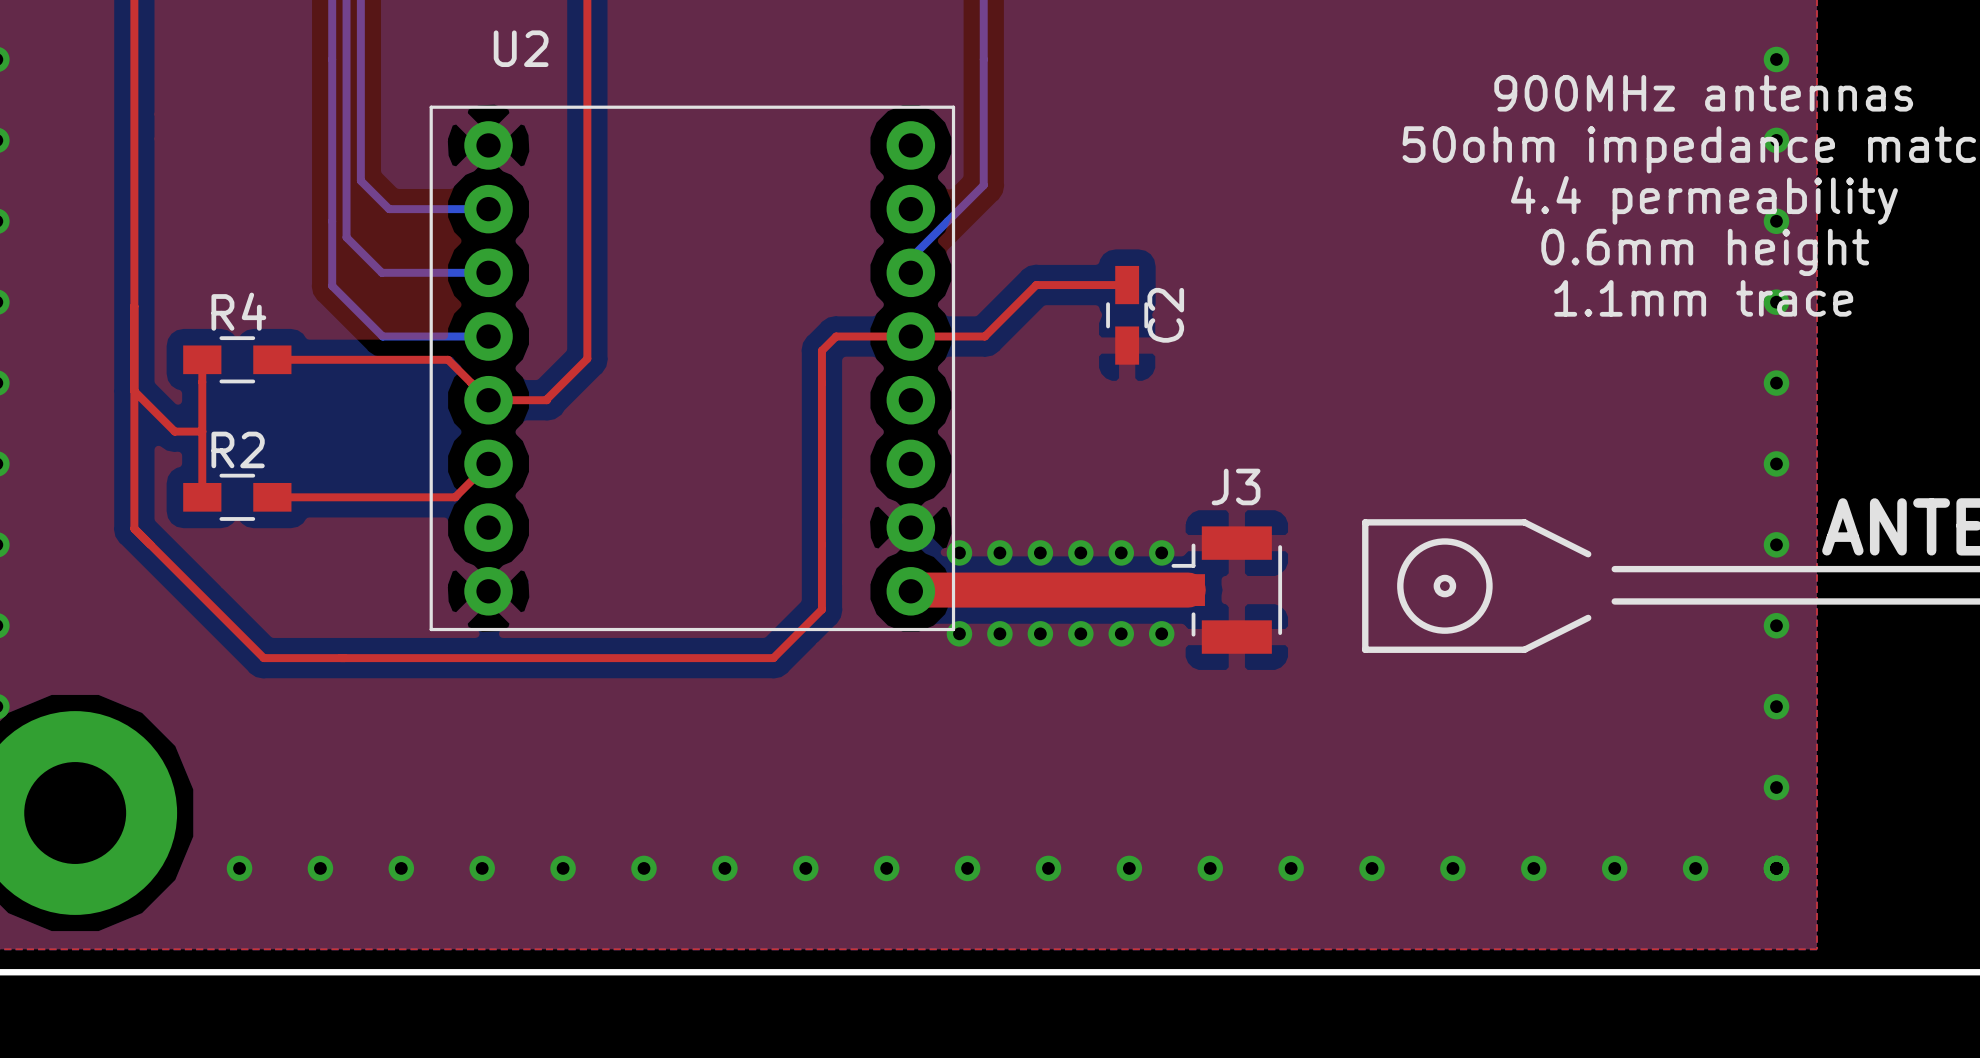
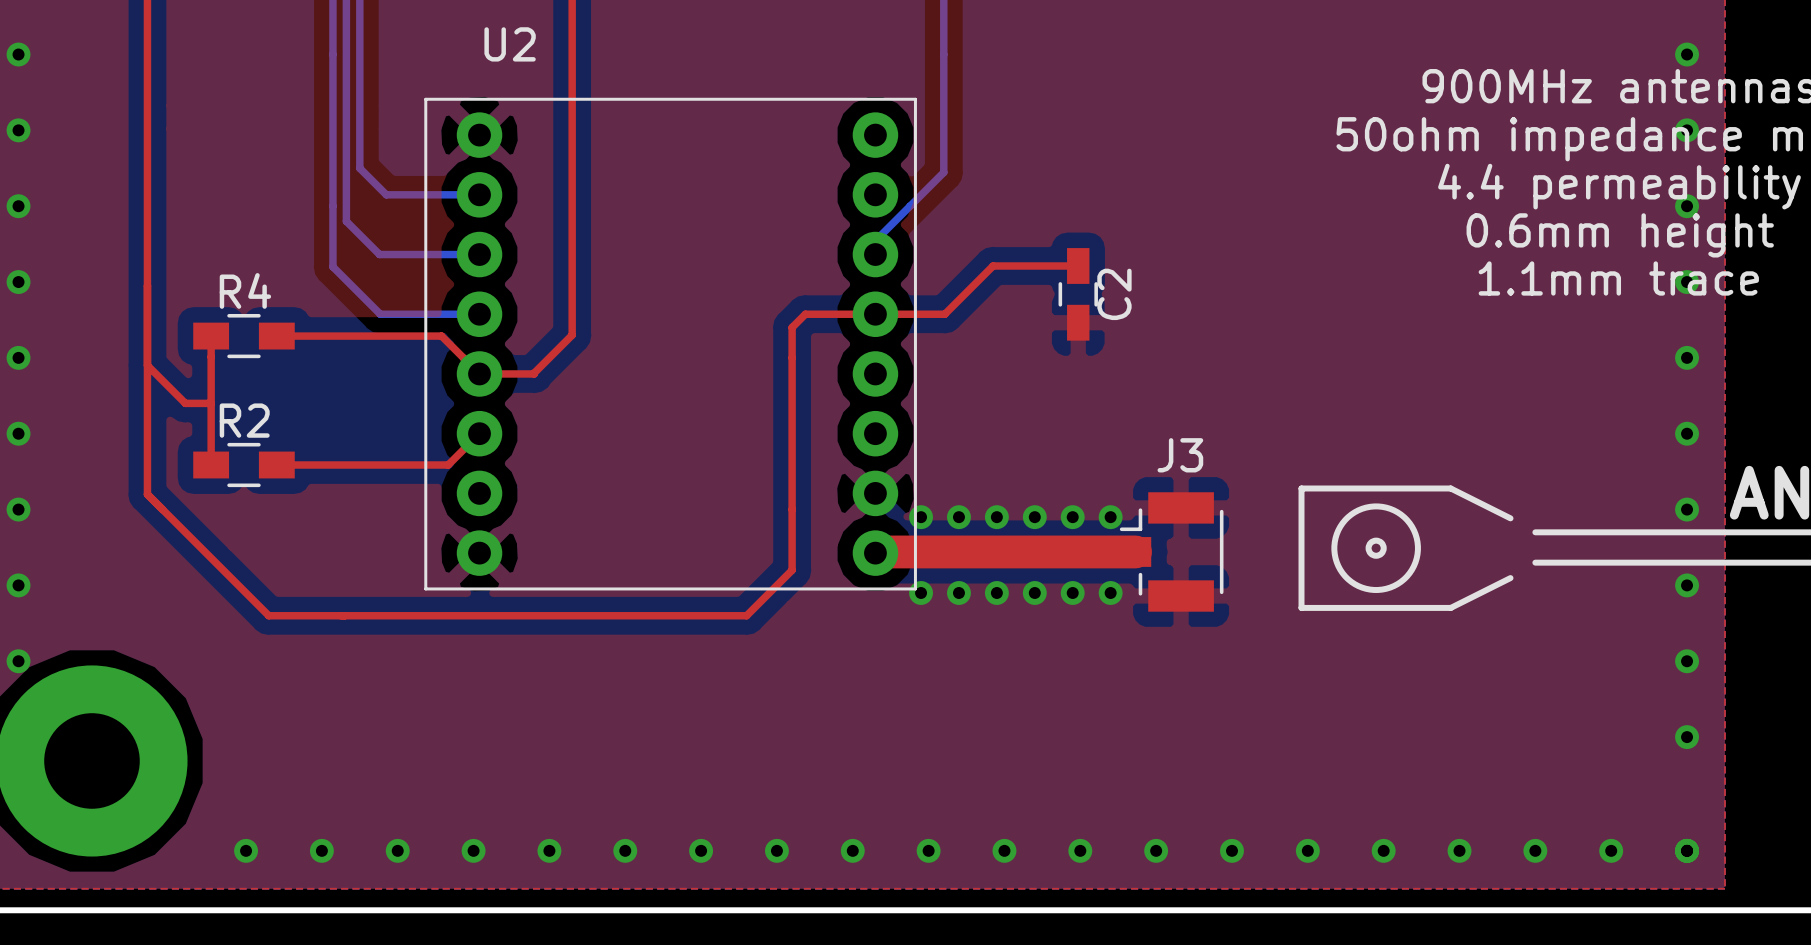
via position: (239, 868) -> (246, 850)
via position: (320, 868) -> (321, 850)
via position: (401, 868) -> (397, 850)
via position: (482, 868) -> (473, 850)
via position: (563, 868) -> (549, 850)
via position: (643, 868) -> (625, 850)
via position: (724, 868) -> (701, 850)
via position: (805, 868) -> (776, 850)
via position: (886, 868) -> (852, 850)
via position: (967, 868) -> (928, 850)
via position: (1048, 868) -> (1004, 850)
via position: (1129, 868) -> (1080, 850)
via position: (1210, 868) -> (1156, 850)
via position: (1291, 868) -> (1231, 850)
via position: (1372, 868) -> (1307, 850)
via position: (1452, 868) -> (1383, 850)
via position: (1533, 868) -> (1459, 850)
via position: (1614, 868) -> (1535, 850)
via position: (1695, 868) -> (1611, 850)
via position: (1776, 868) -> (1687, 850)

